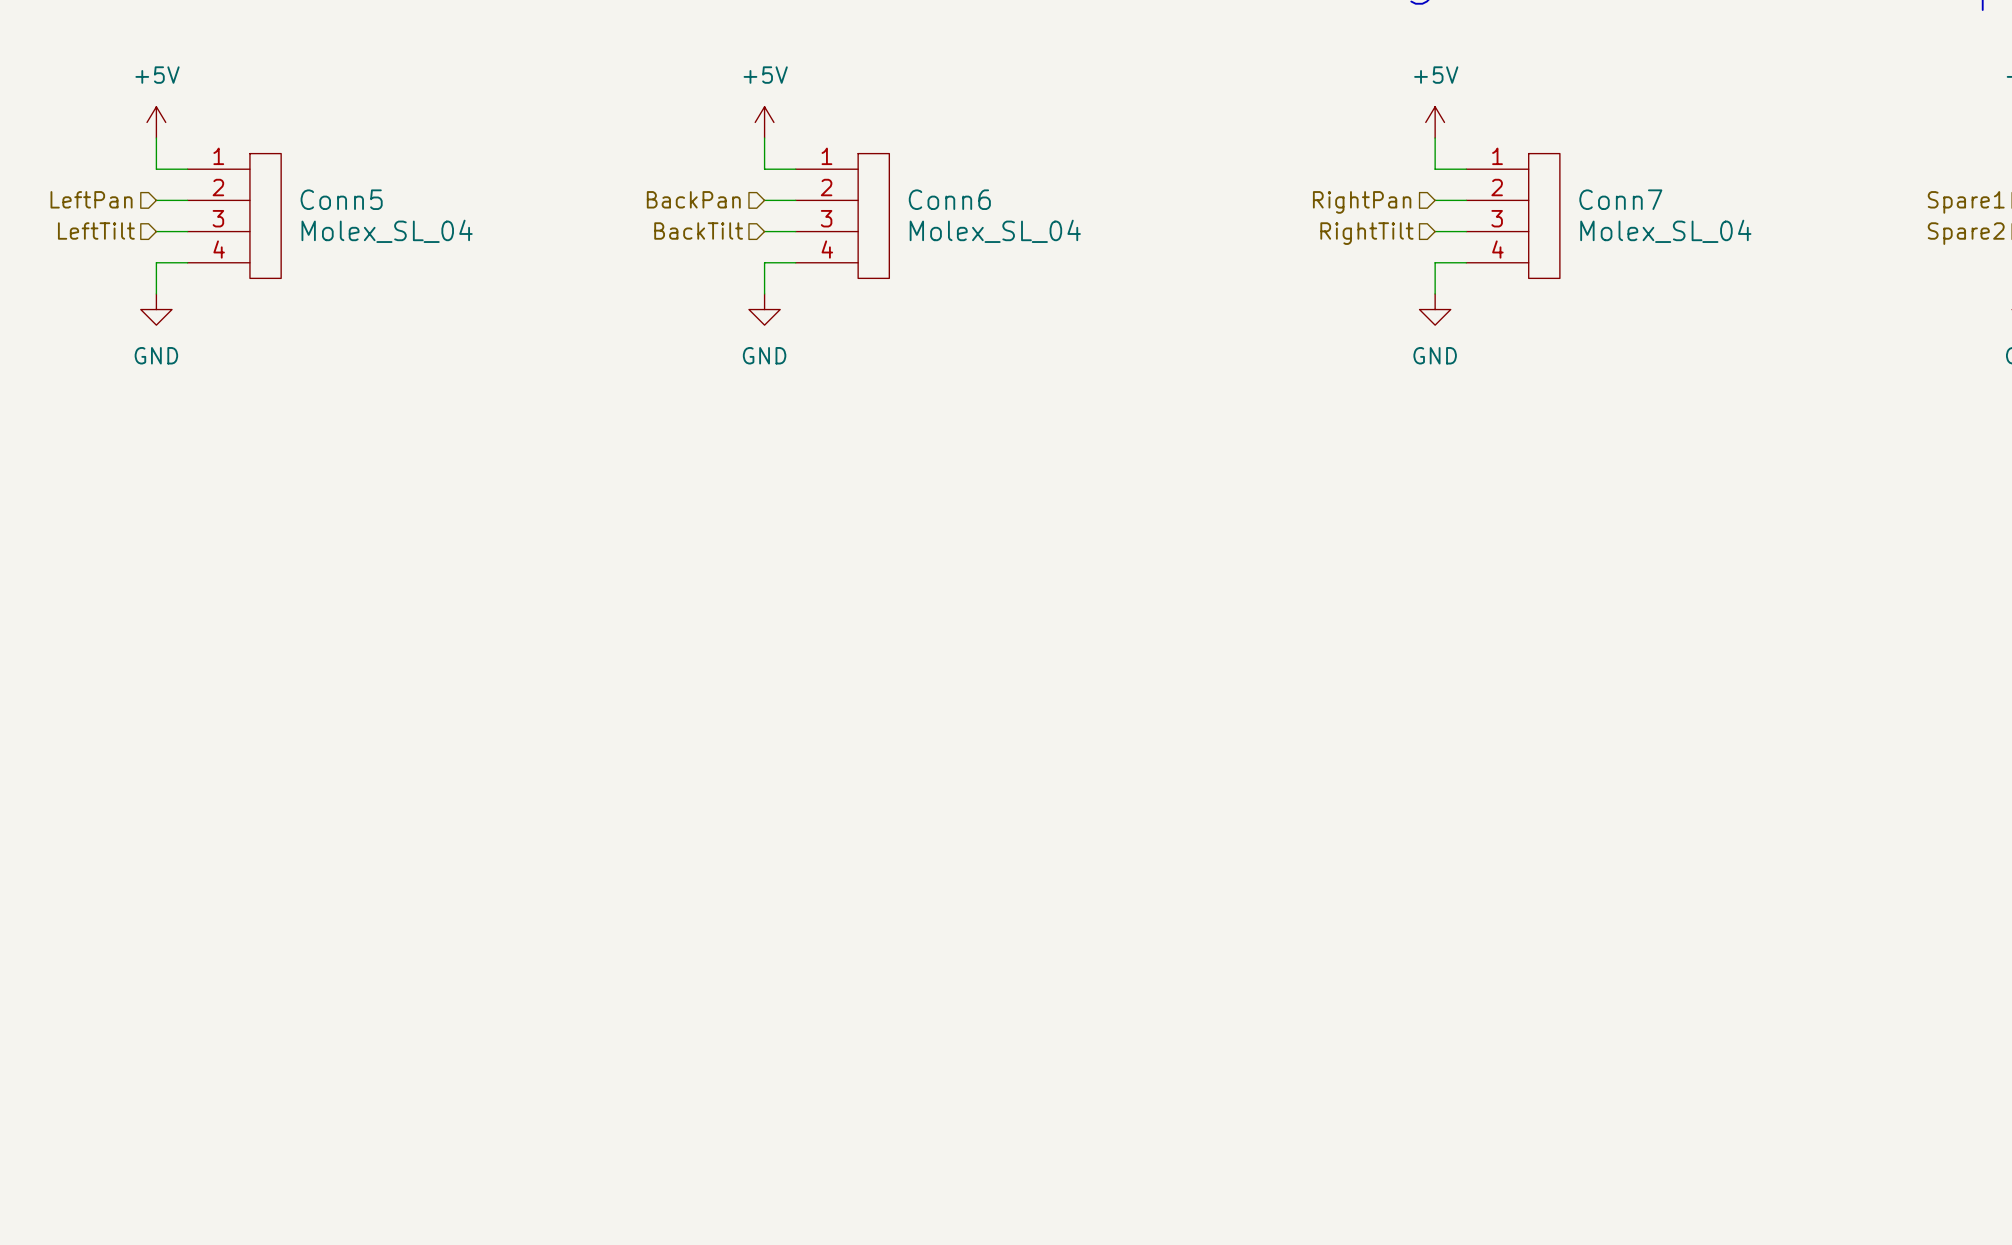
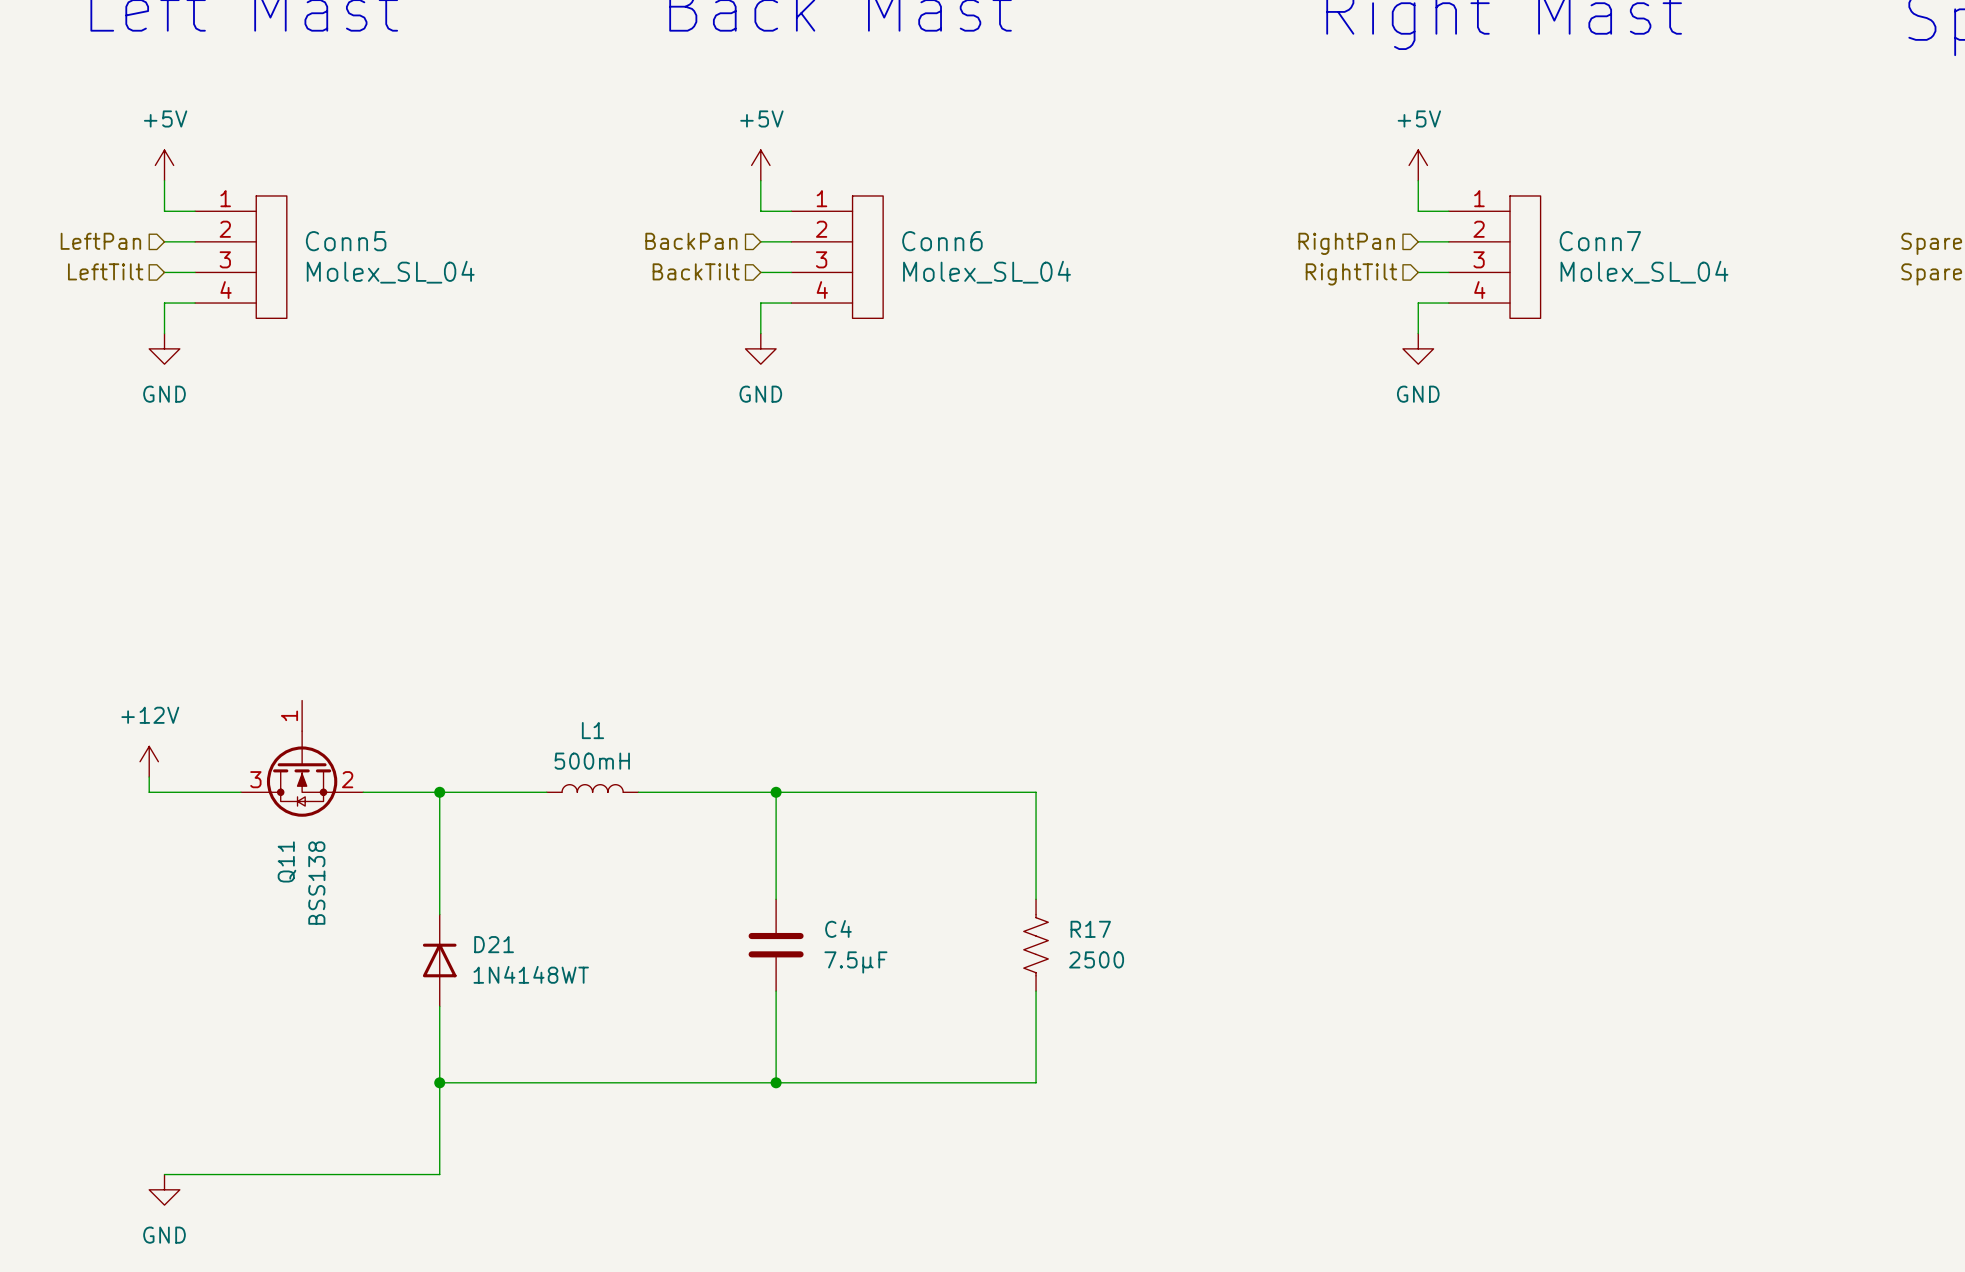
Q11: none -> BSS138 (302, 758)
power symbol: none -> +12V (149, 761)
wire: none -> (149, 777) (149, 792) (240, 792)
L1: none -> 500mH (592, 788)
wire: none -> (363, 792) (546, 792)
wire: none -> (439, 792) (439, 914)
junction: none -> (439, 792)
wire: none -> (638, 792) (1036, 792) (1036, 899)
wire: none -> (776, 792) (776, 899)
junction: none -> (776, 792)
C4: none -> 7.5µF (776, 945)
R17: none -> 2500 (1036, 945)
D21: none -> 1N4148WT (439, 960)
wire: none -> (776, 991) (776, 1082)
wire: none -> (1036, 991) (1036, 1082) (439, 1082)
wire: none -> (439, 1006) (439, 1174) (164, 1174)
junction: none -> (439, 1082)
junction: none -> (776, 1082)
power symbol: none -> GND (164, 1189)

